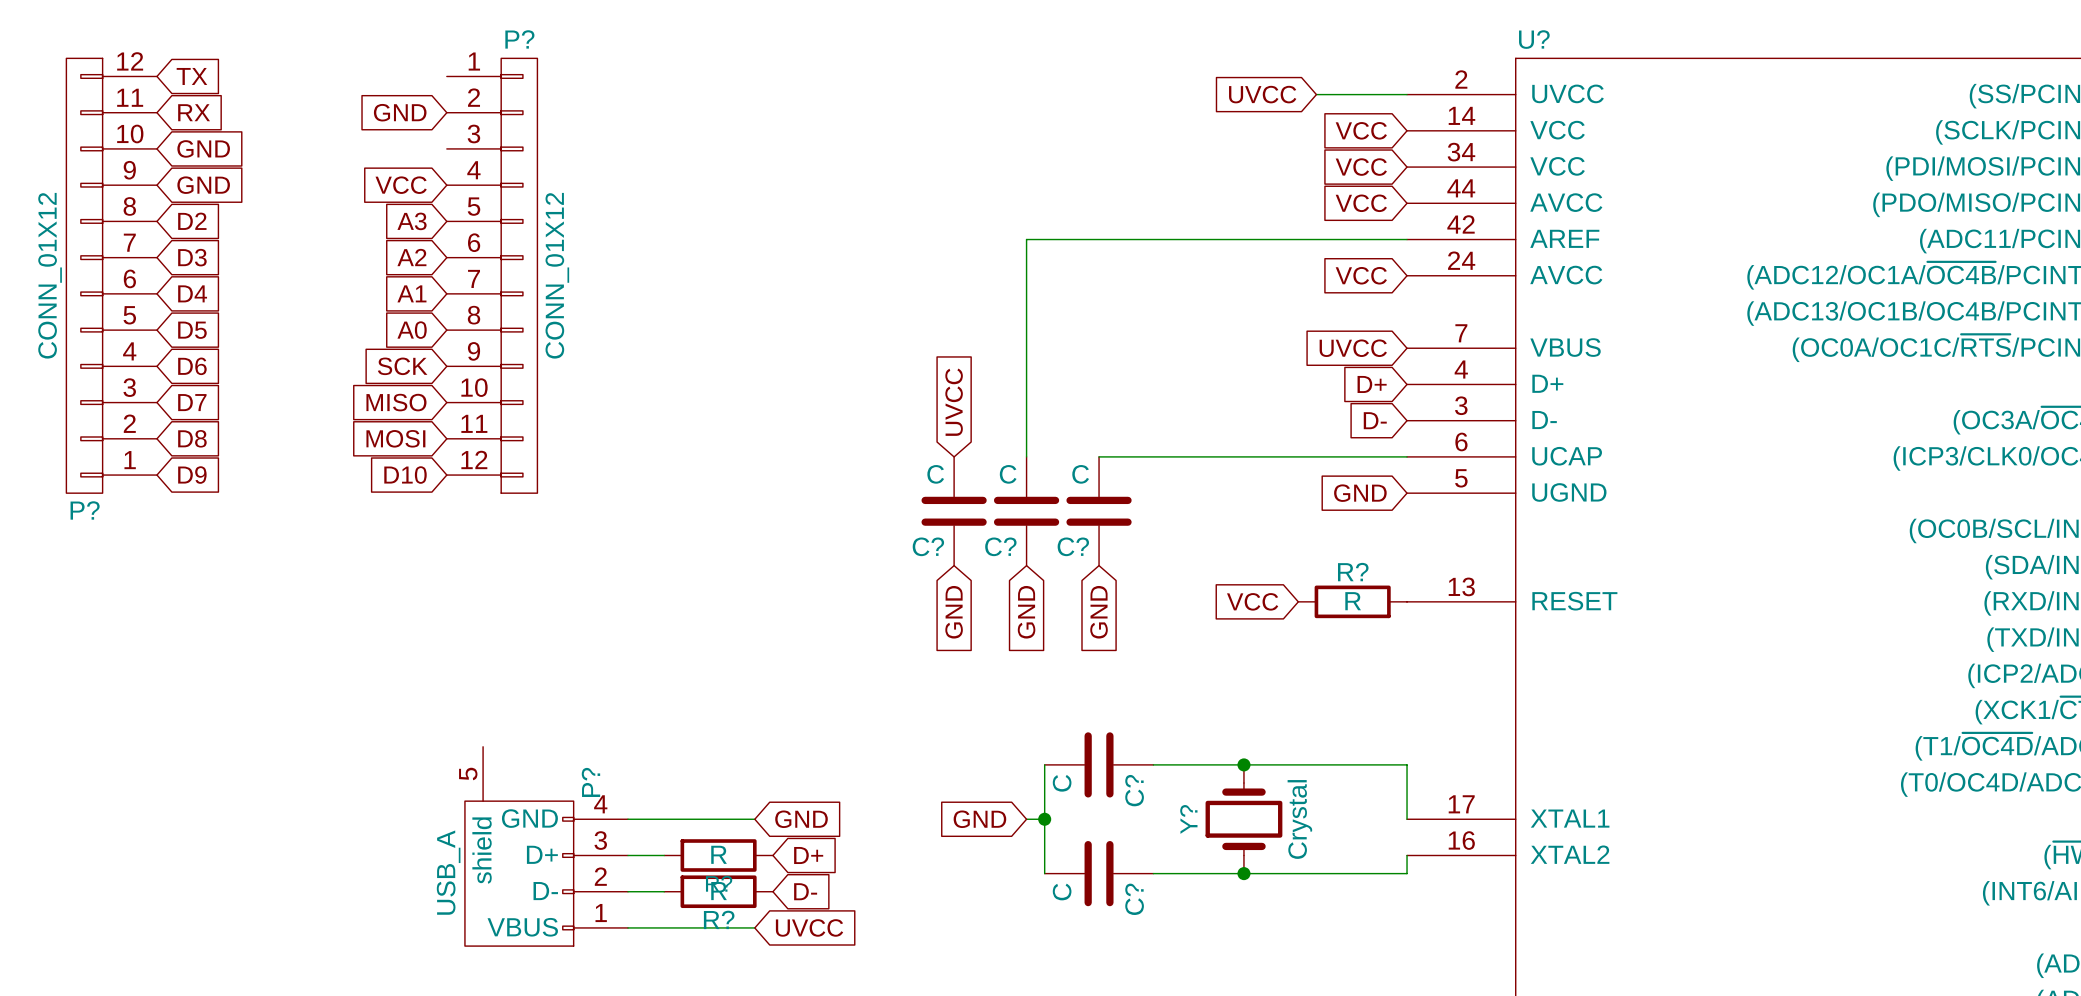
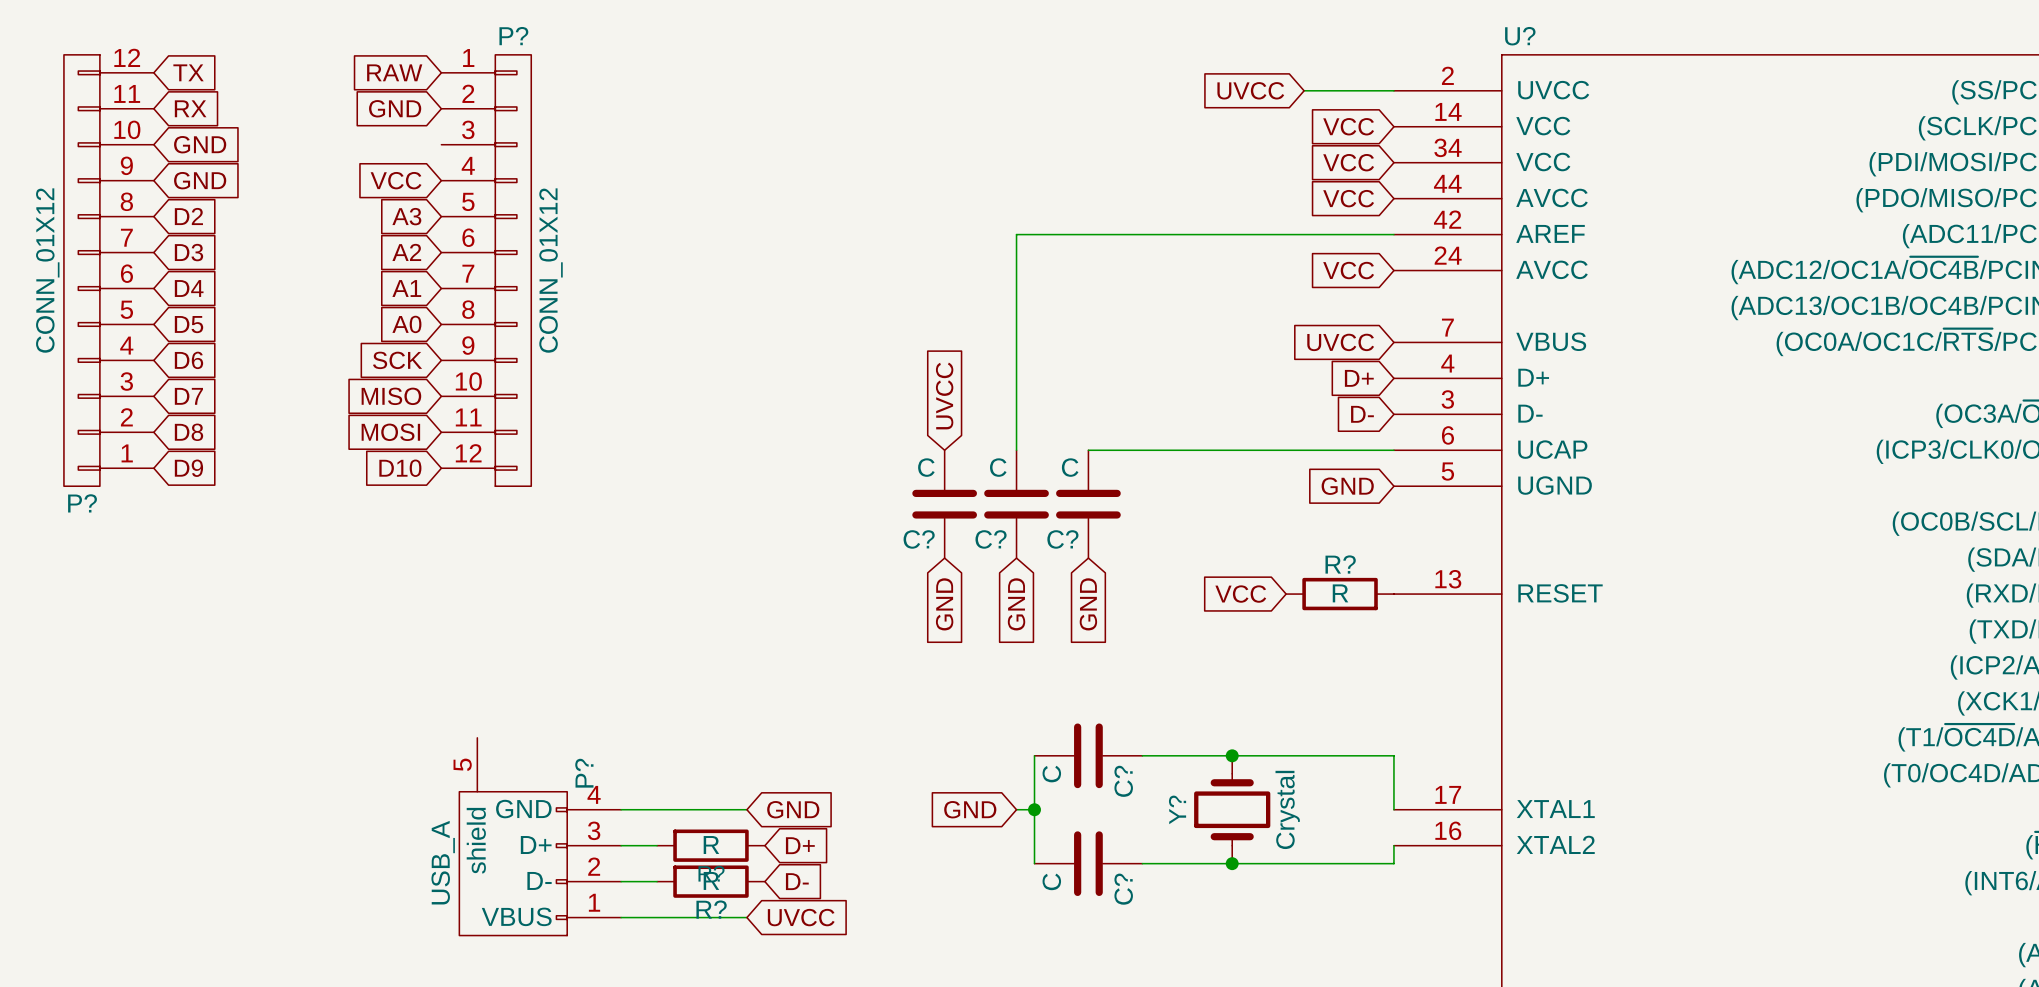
global label: none -> RAW (394, 72)

